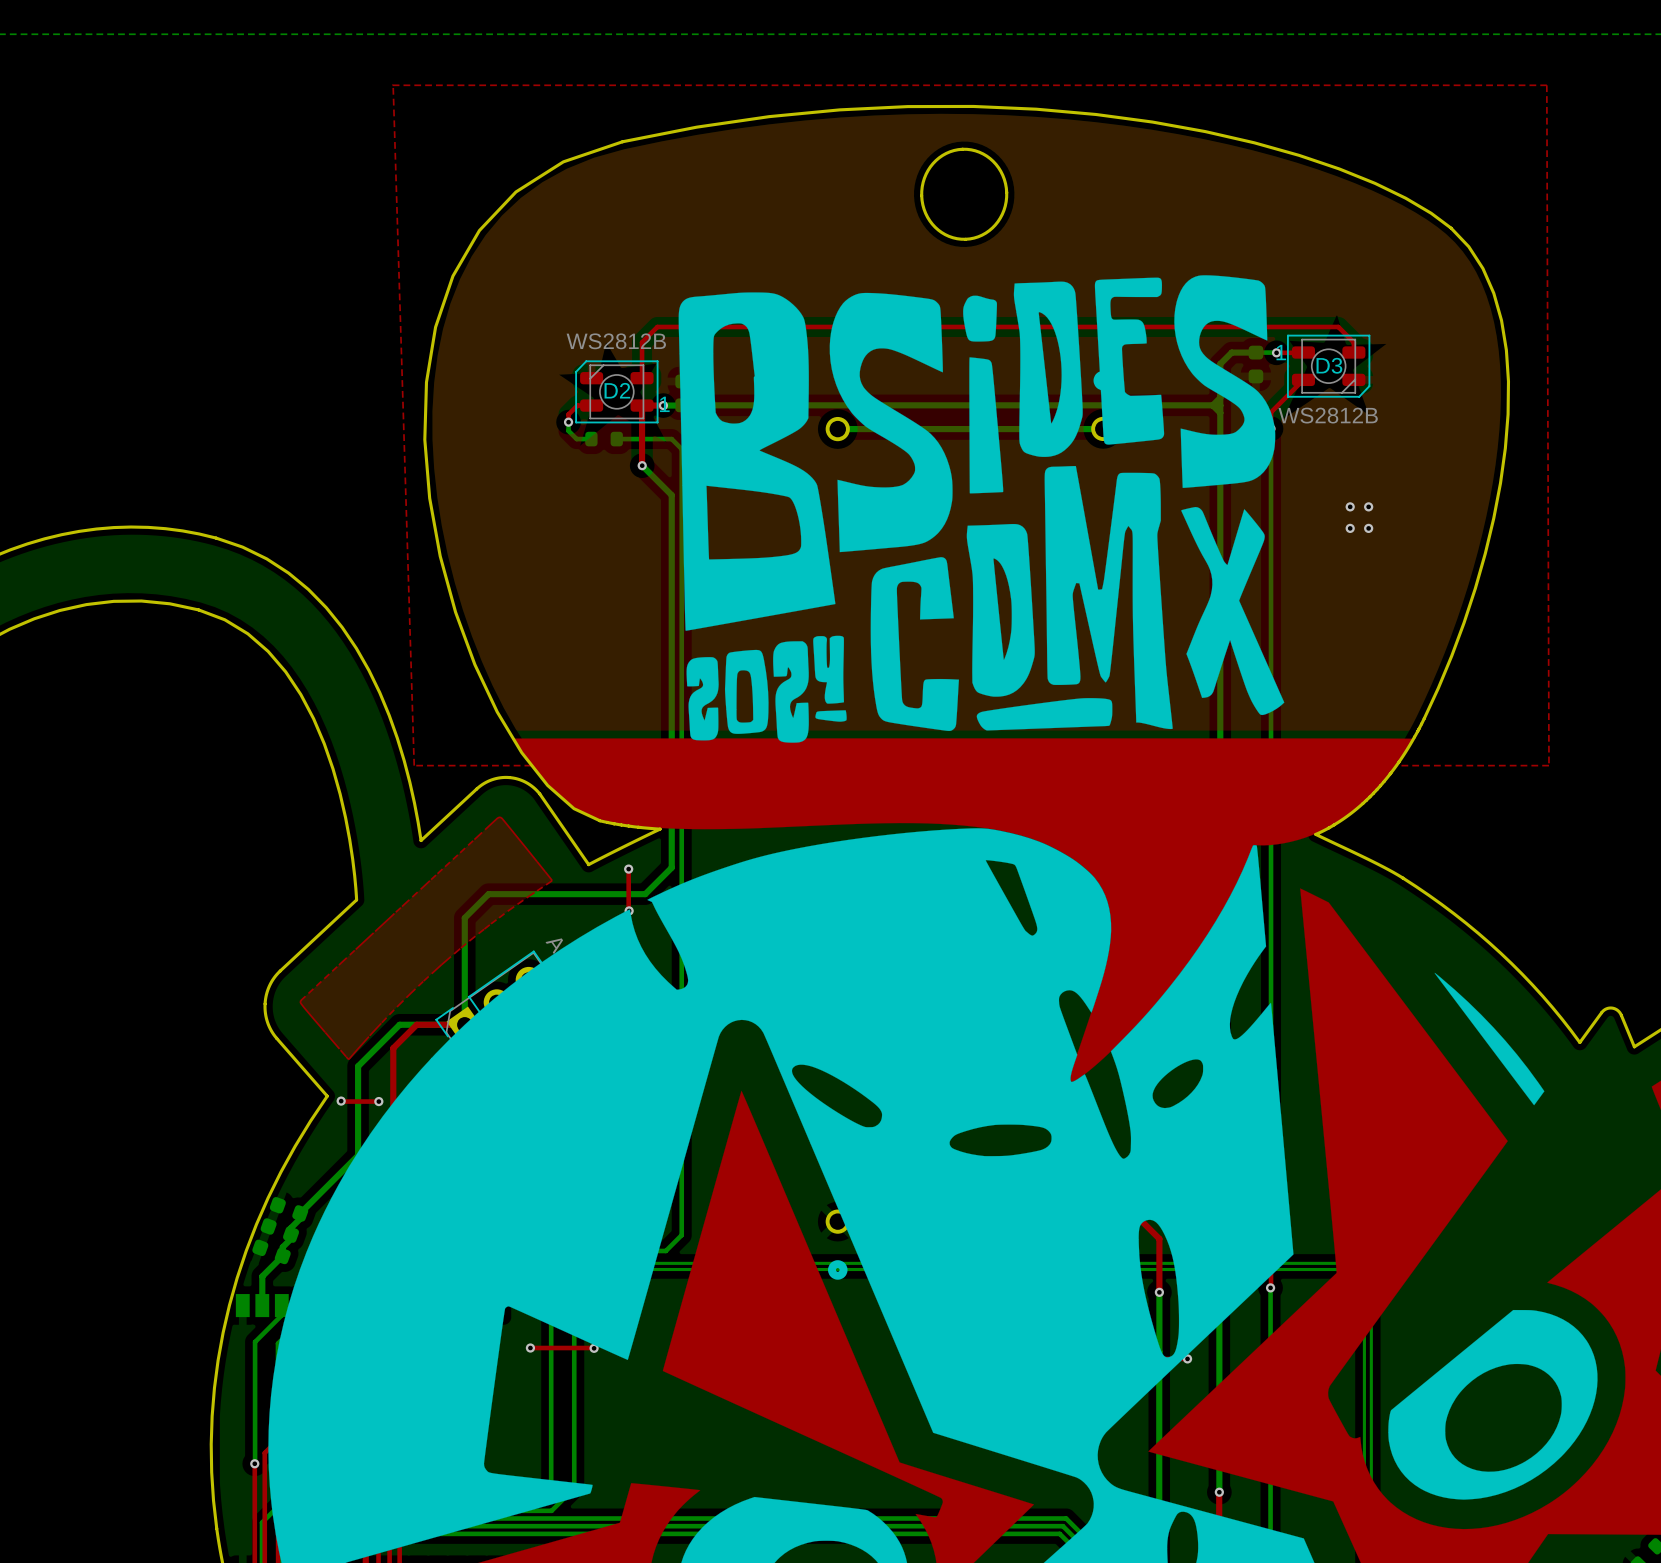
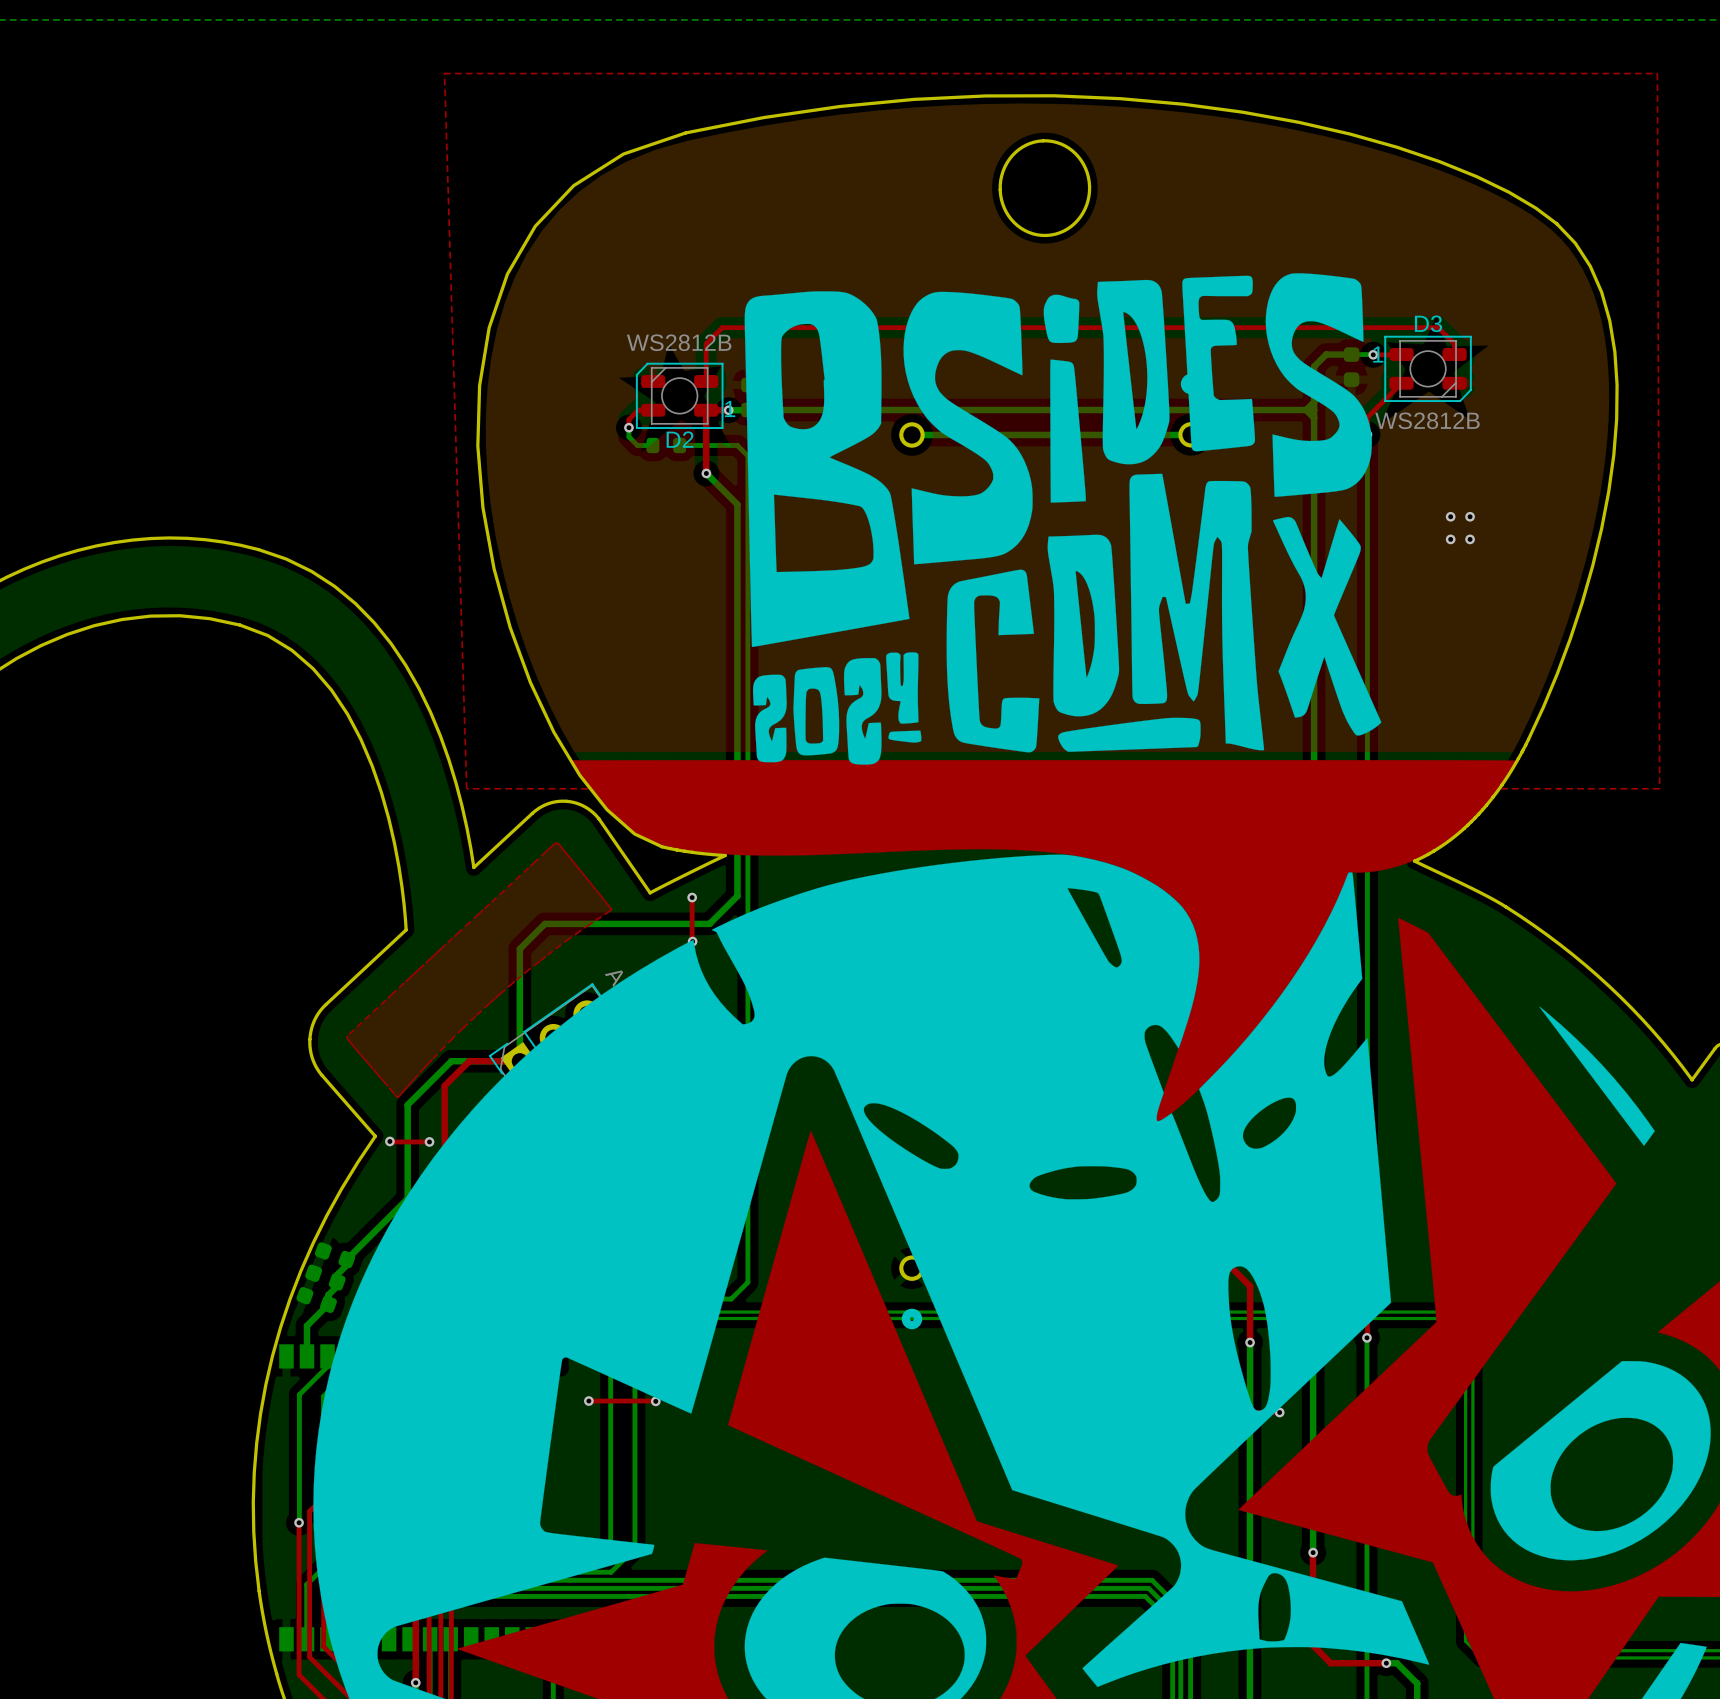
D3 name position: D3 (1329, 365) -> D3 (1428, 323)
D2 name position: D2 (617, 390) -> D2 (680, 439)

